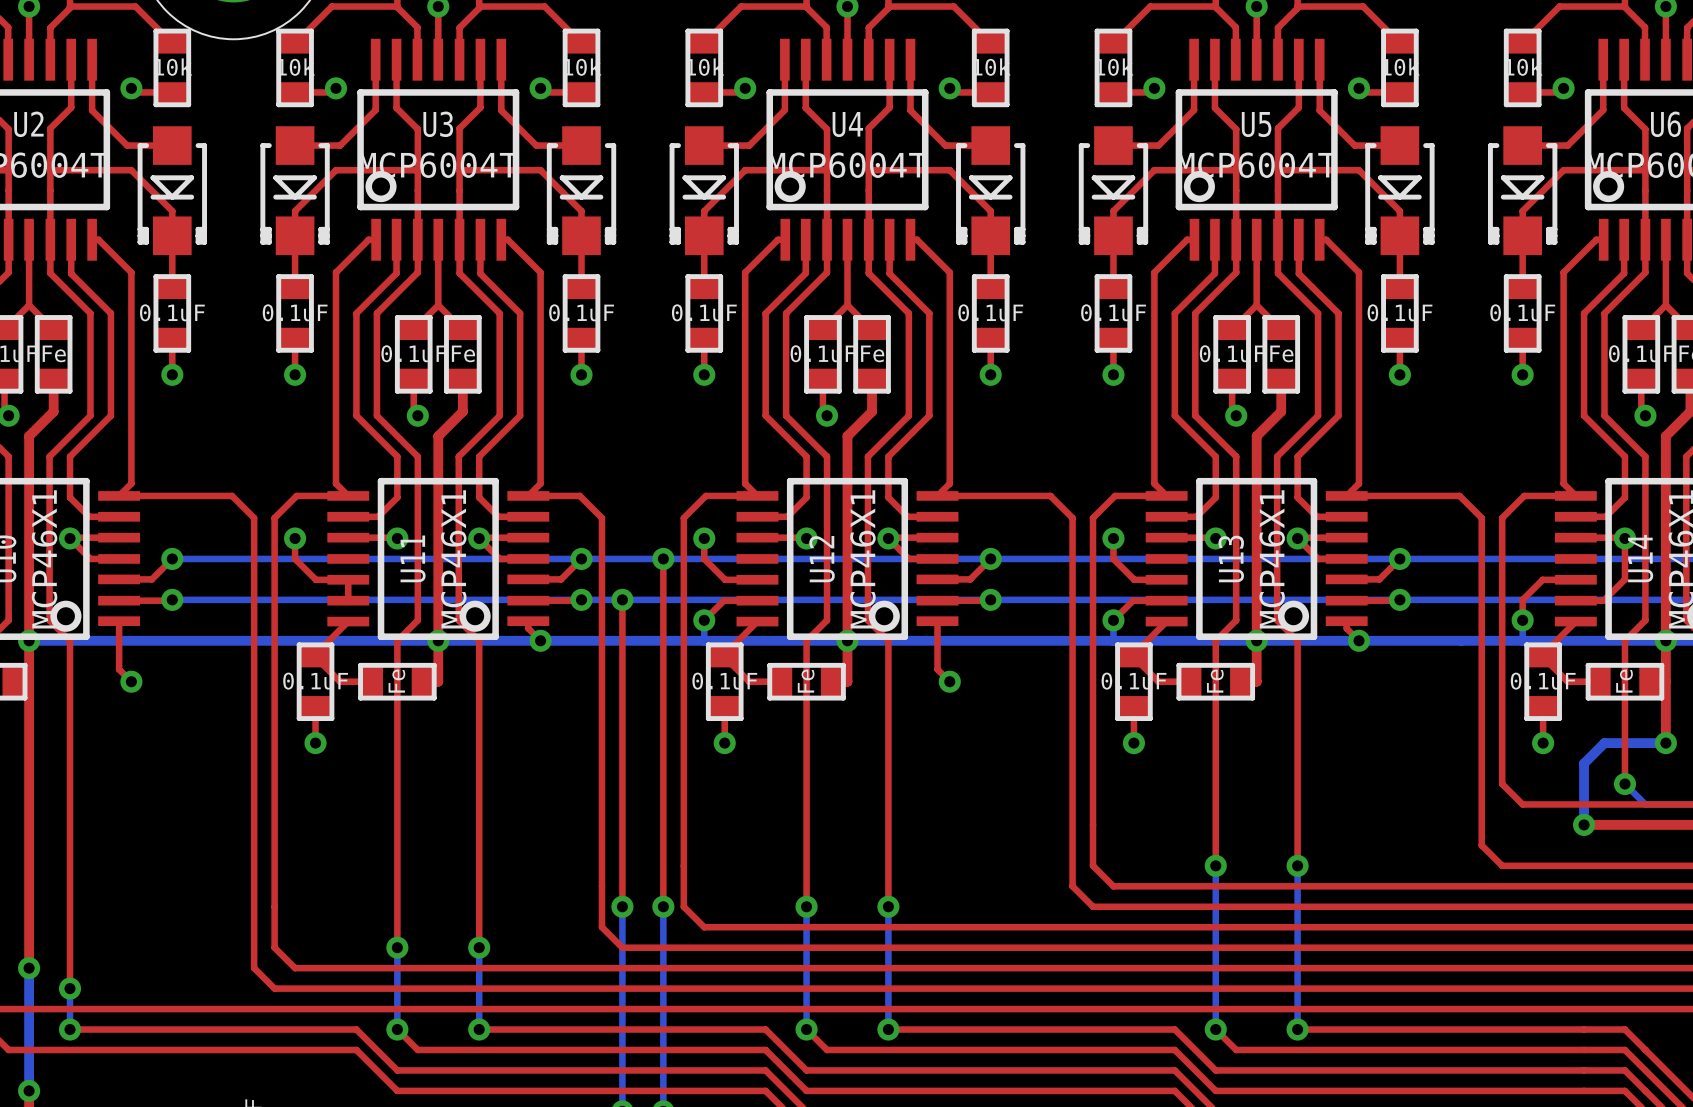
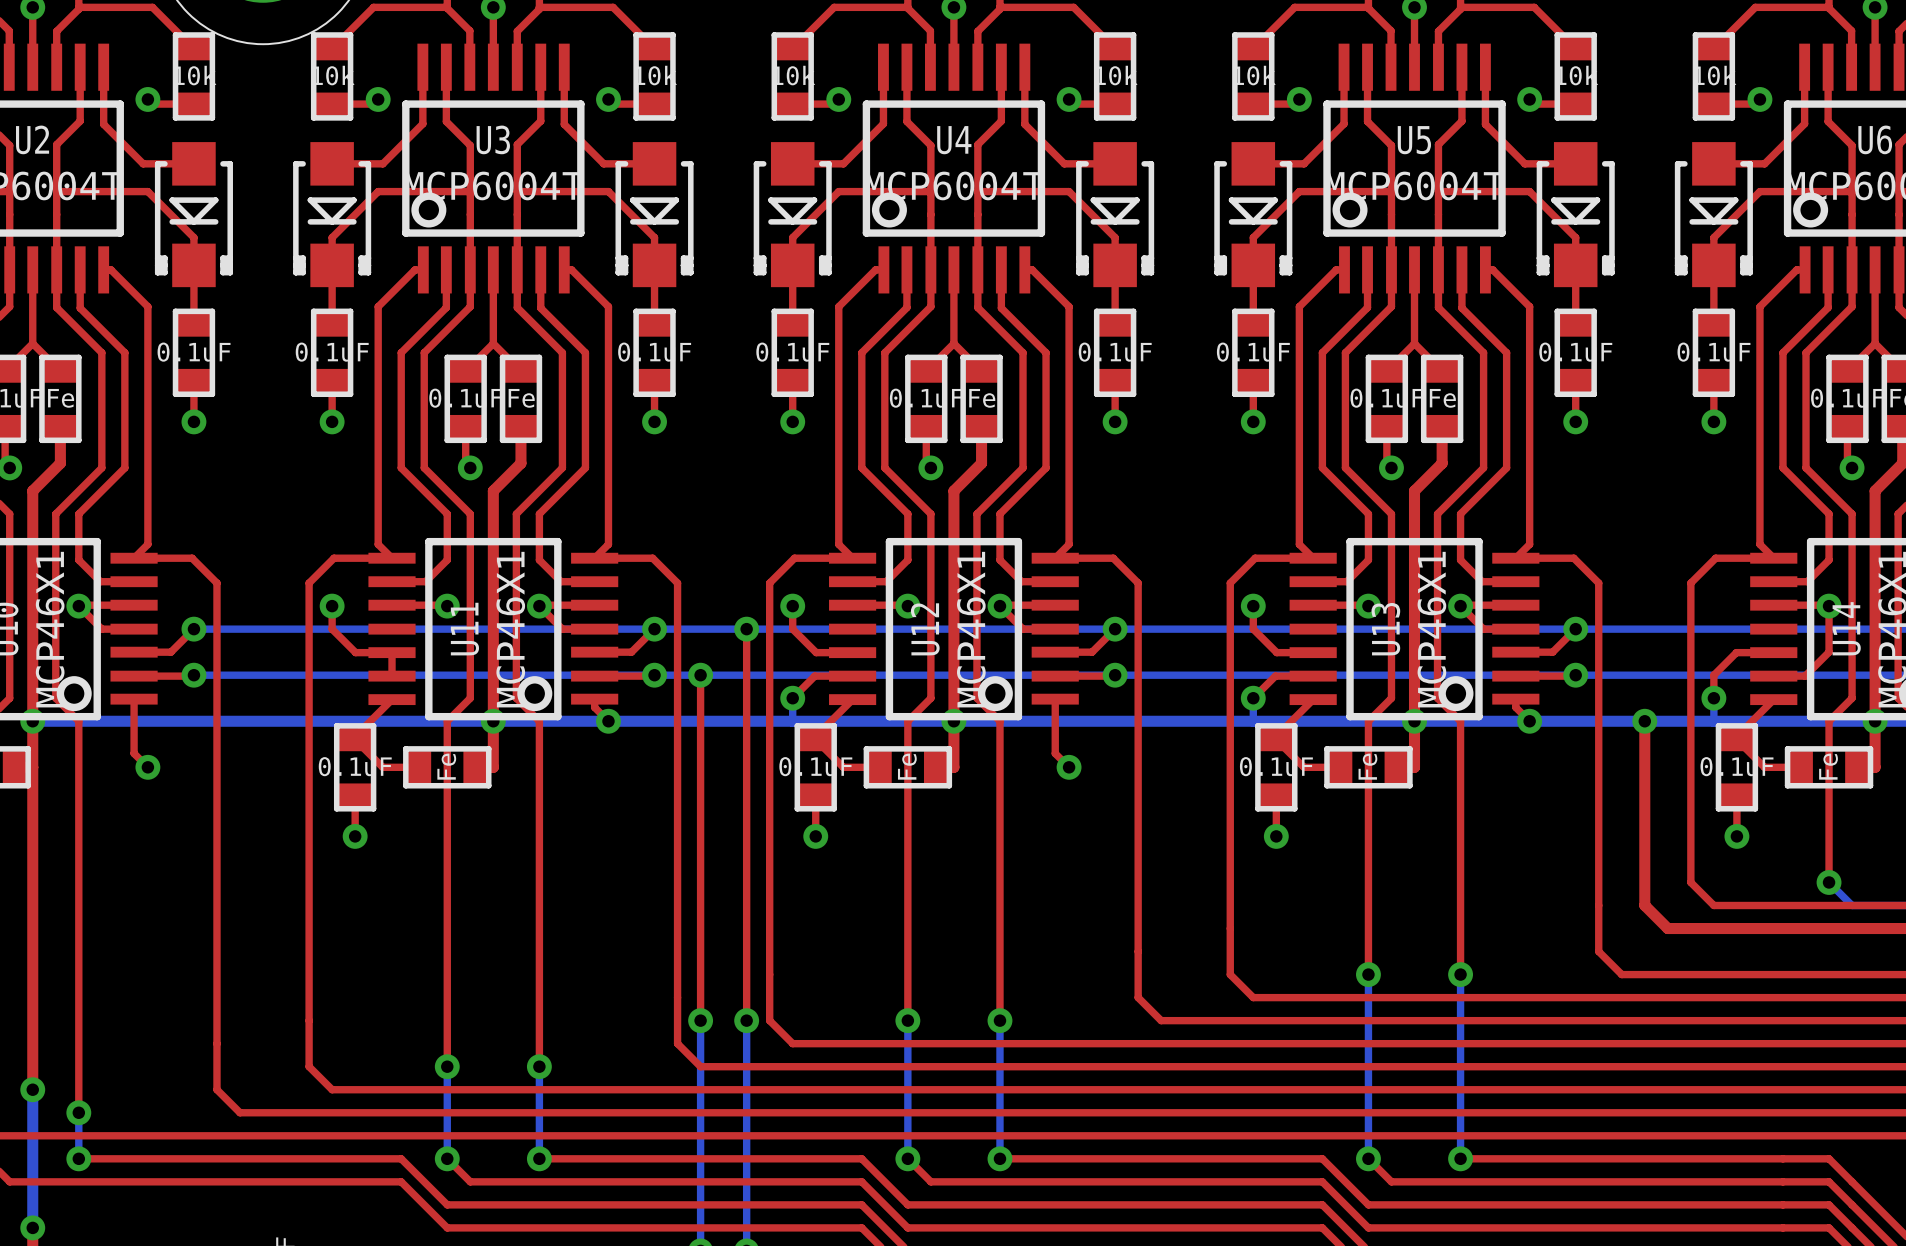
top track: (170, 495) (232, 495) (254, 518) (254, 968) (274, 988) -> (192, 558) (216, 583) (216, 1089) (240, 1112) (309, 1112)
top track: (989, 495) (1050, 495) (1072, 518) (1072, 886) (1093, 906) -> (1113, 558) (1138, 583) (1138, 997) (1161, 1020) (1230, 1020)
top track: (1398, 495) (1459, 495) (1481, 518) (1481, 845) (1502, 865) -> (1573, 558) (1598, 583) (1598, 951) (1621, 974) (1690, 974)
top track: none -> (1644, 721) (1644, 905) (1667, 928) (1782, 928)
via: none -> (1644, 721)
top track: (1665, 681) (1665, 743) -> none
bottom track: (1665, 743) (1604, 743) (1584, 763) (1584, 824) -> none
via: (1665, 743) -> none
via: (1584, 824) -> none

